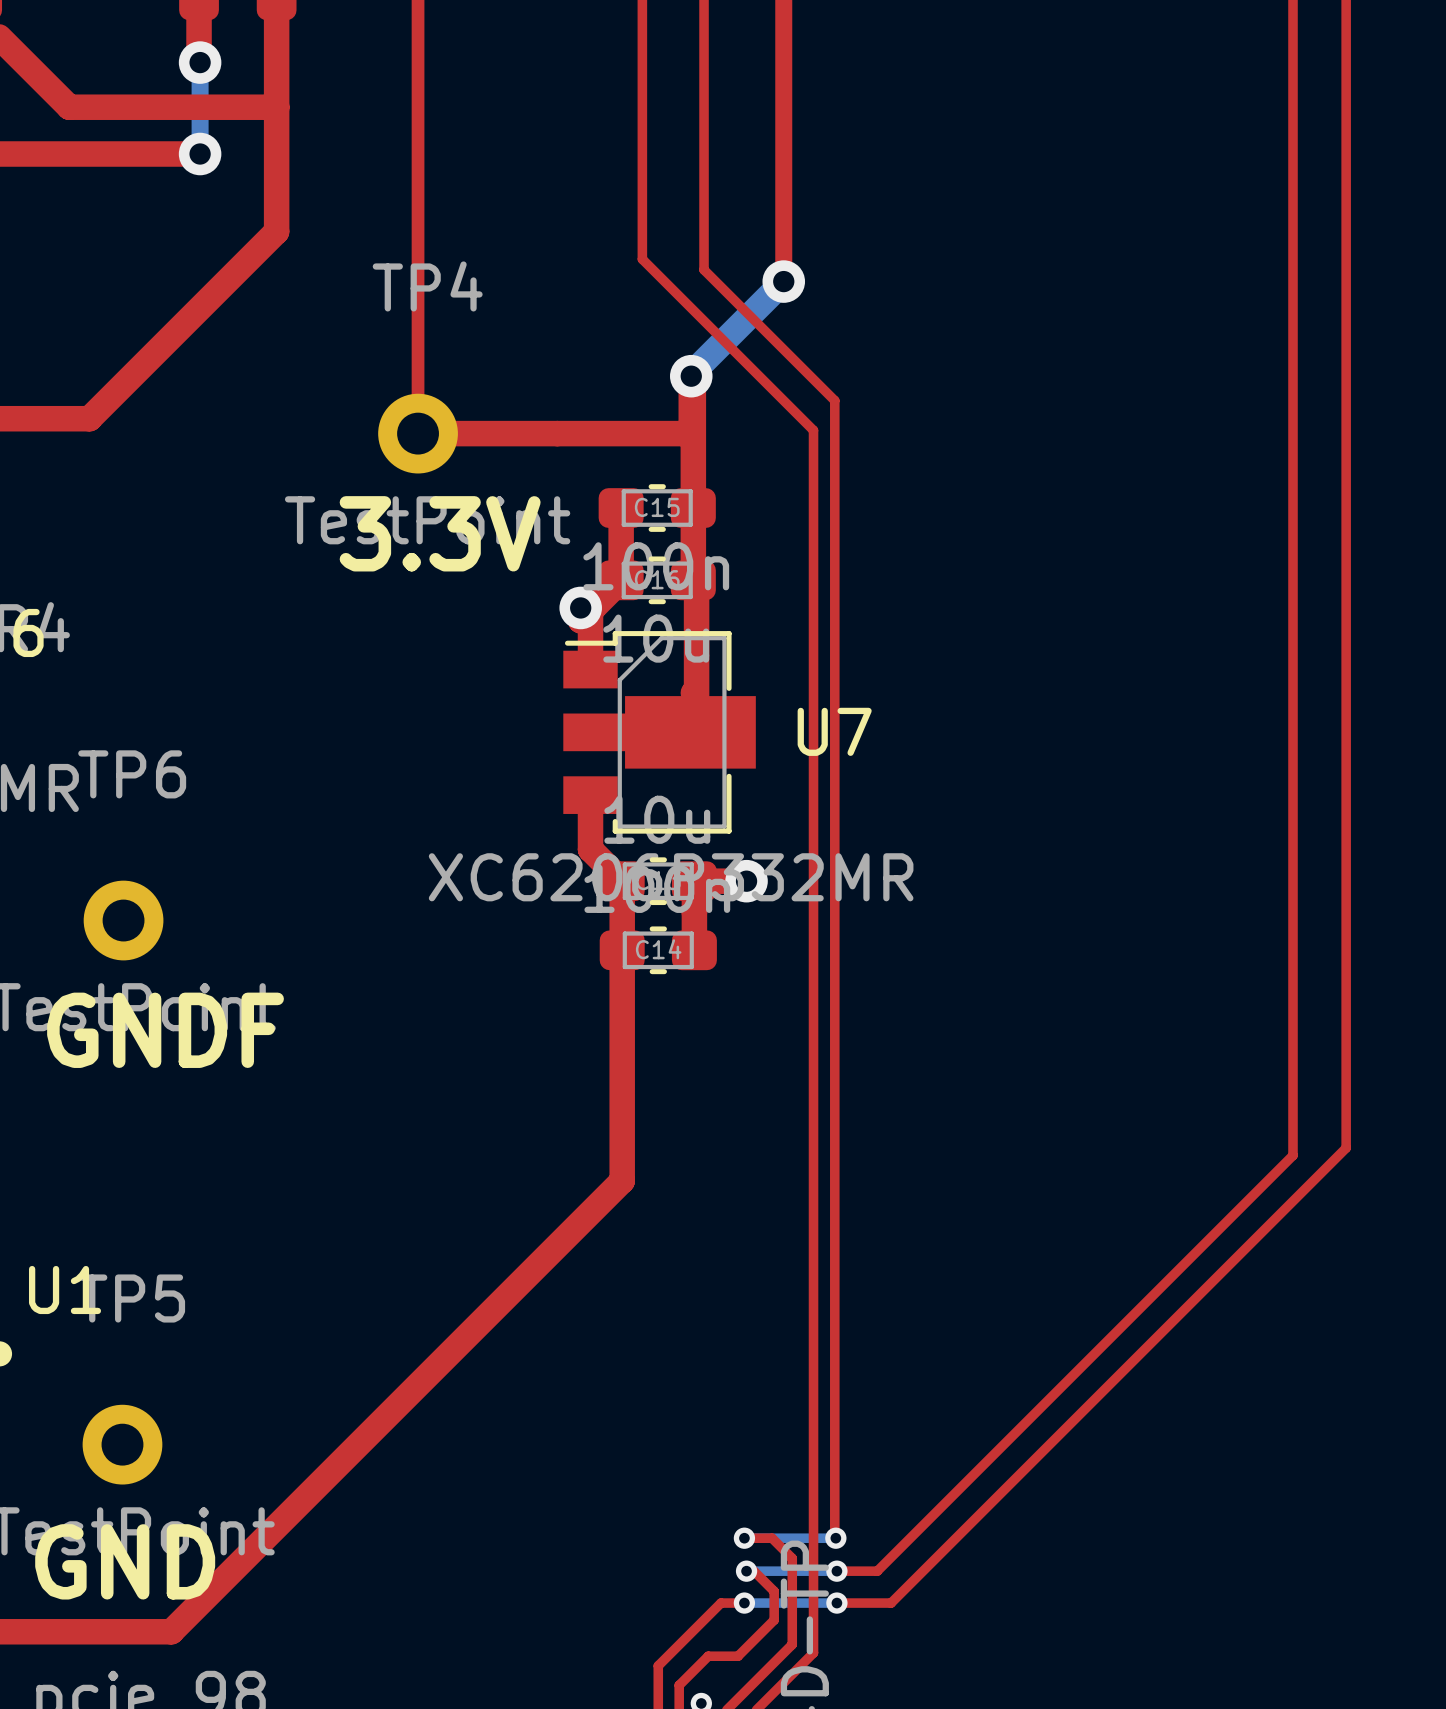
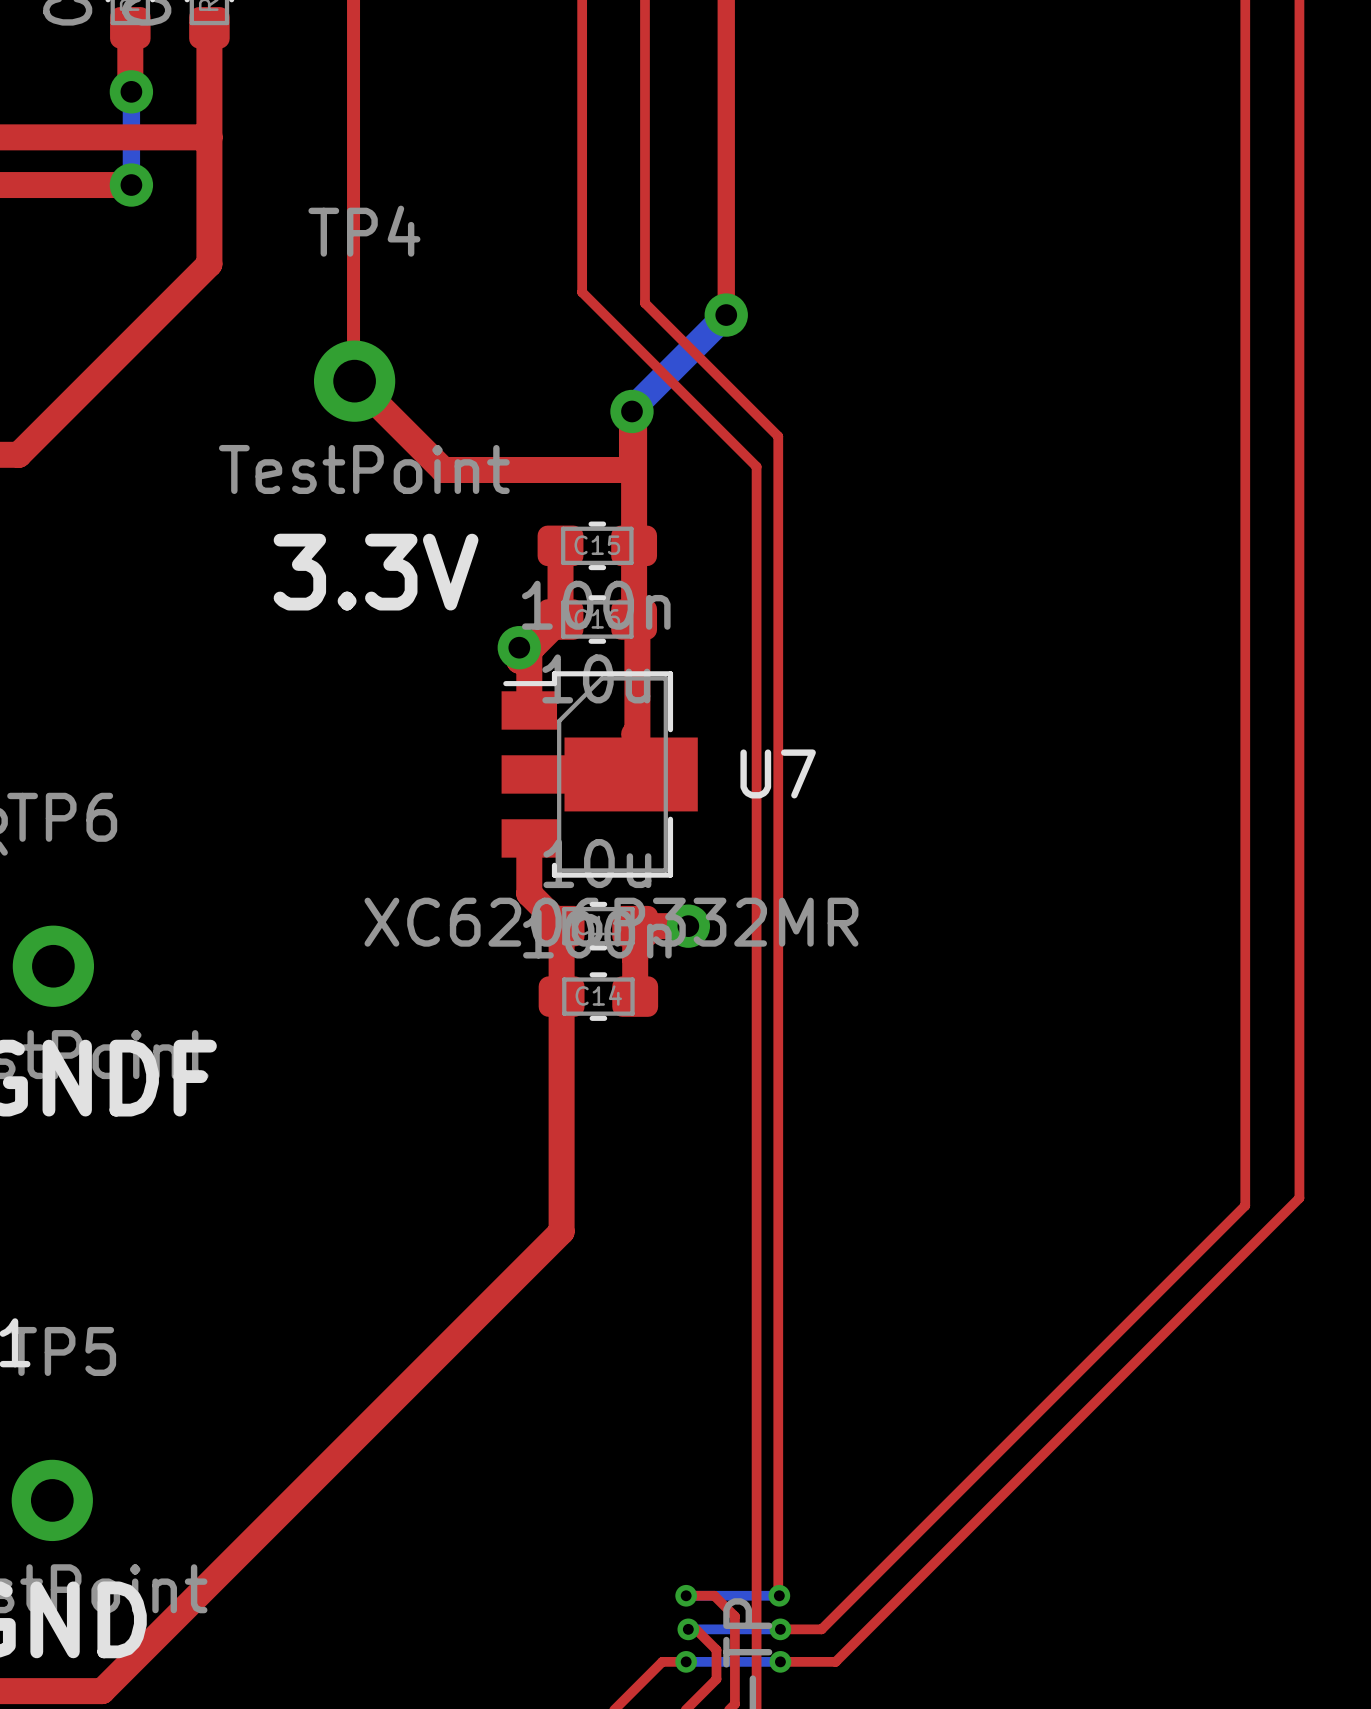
top track: (418, 345) (418, 433) (506, 433) -> (353, 380) (443, 469)
TP4 position: (418, 433) -> (354, 381)

